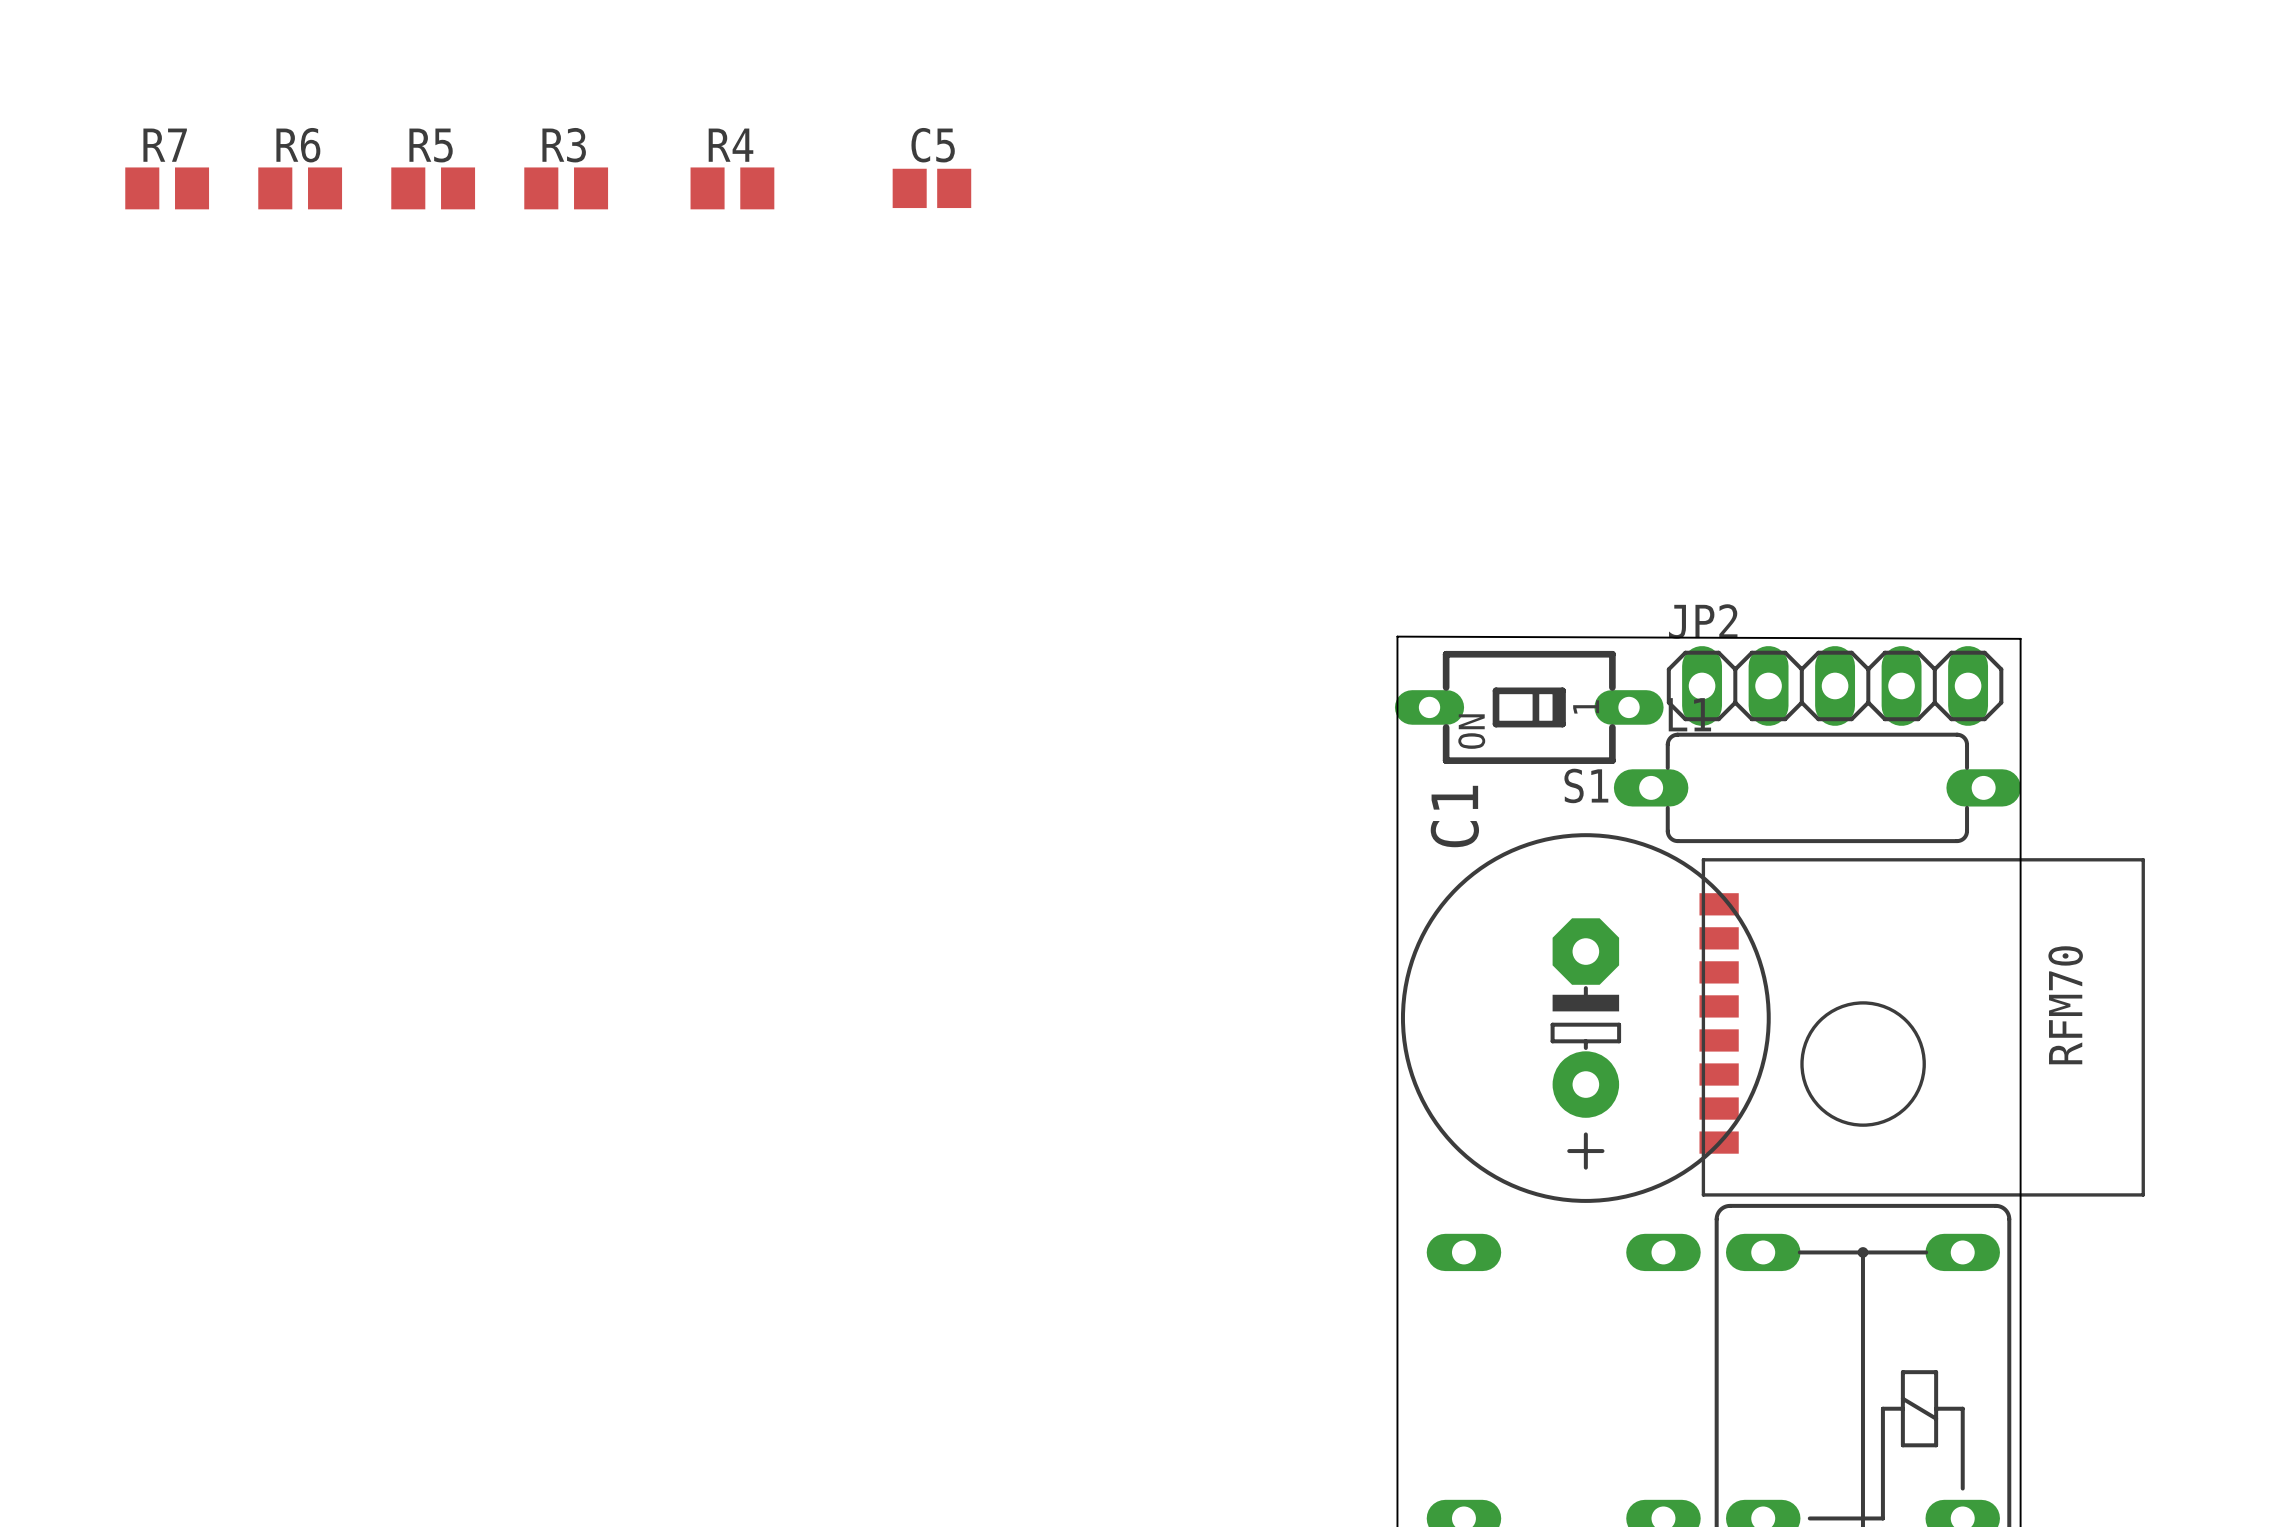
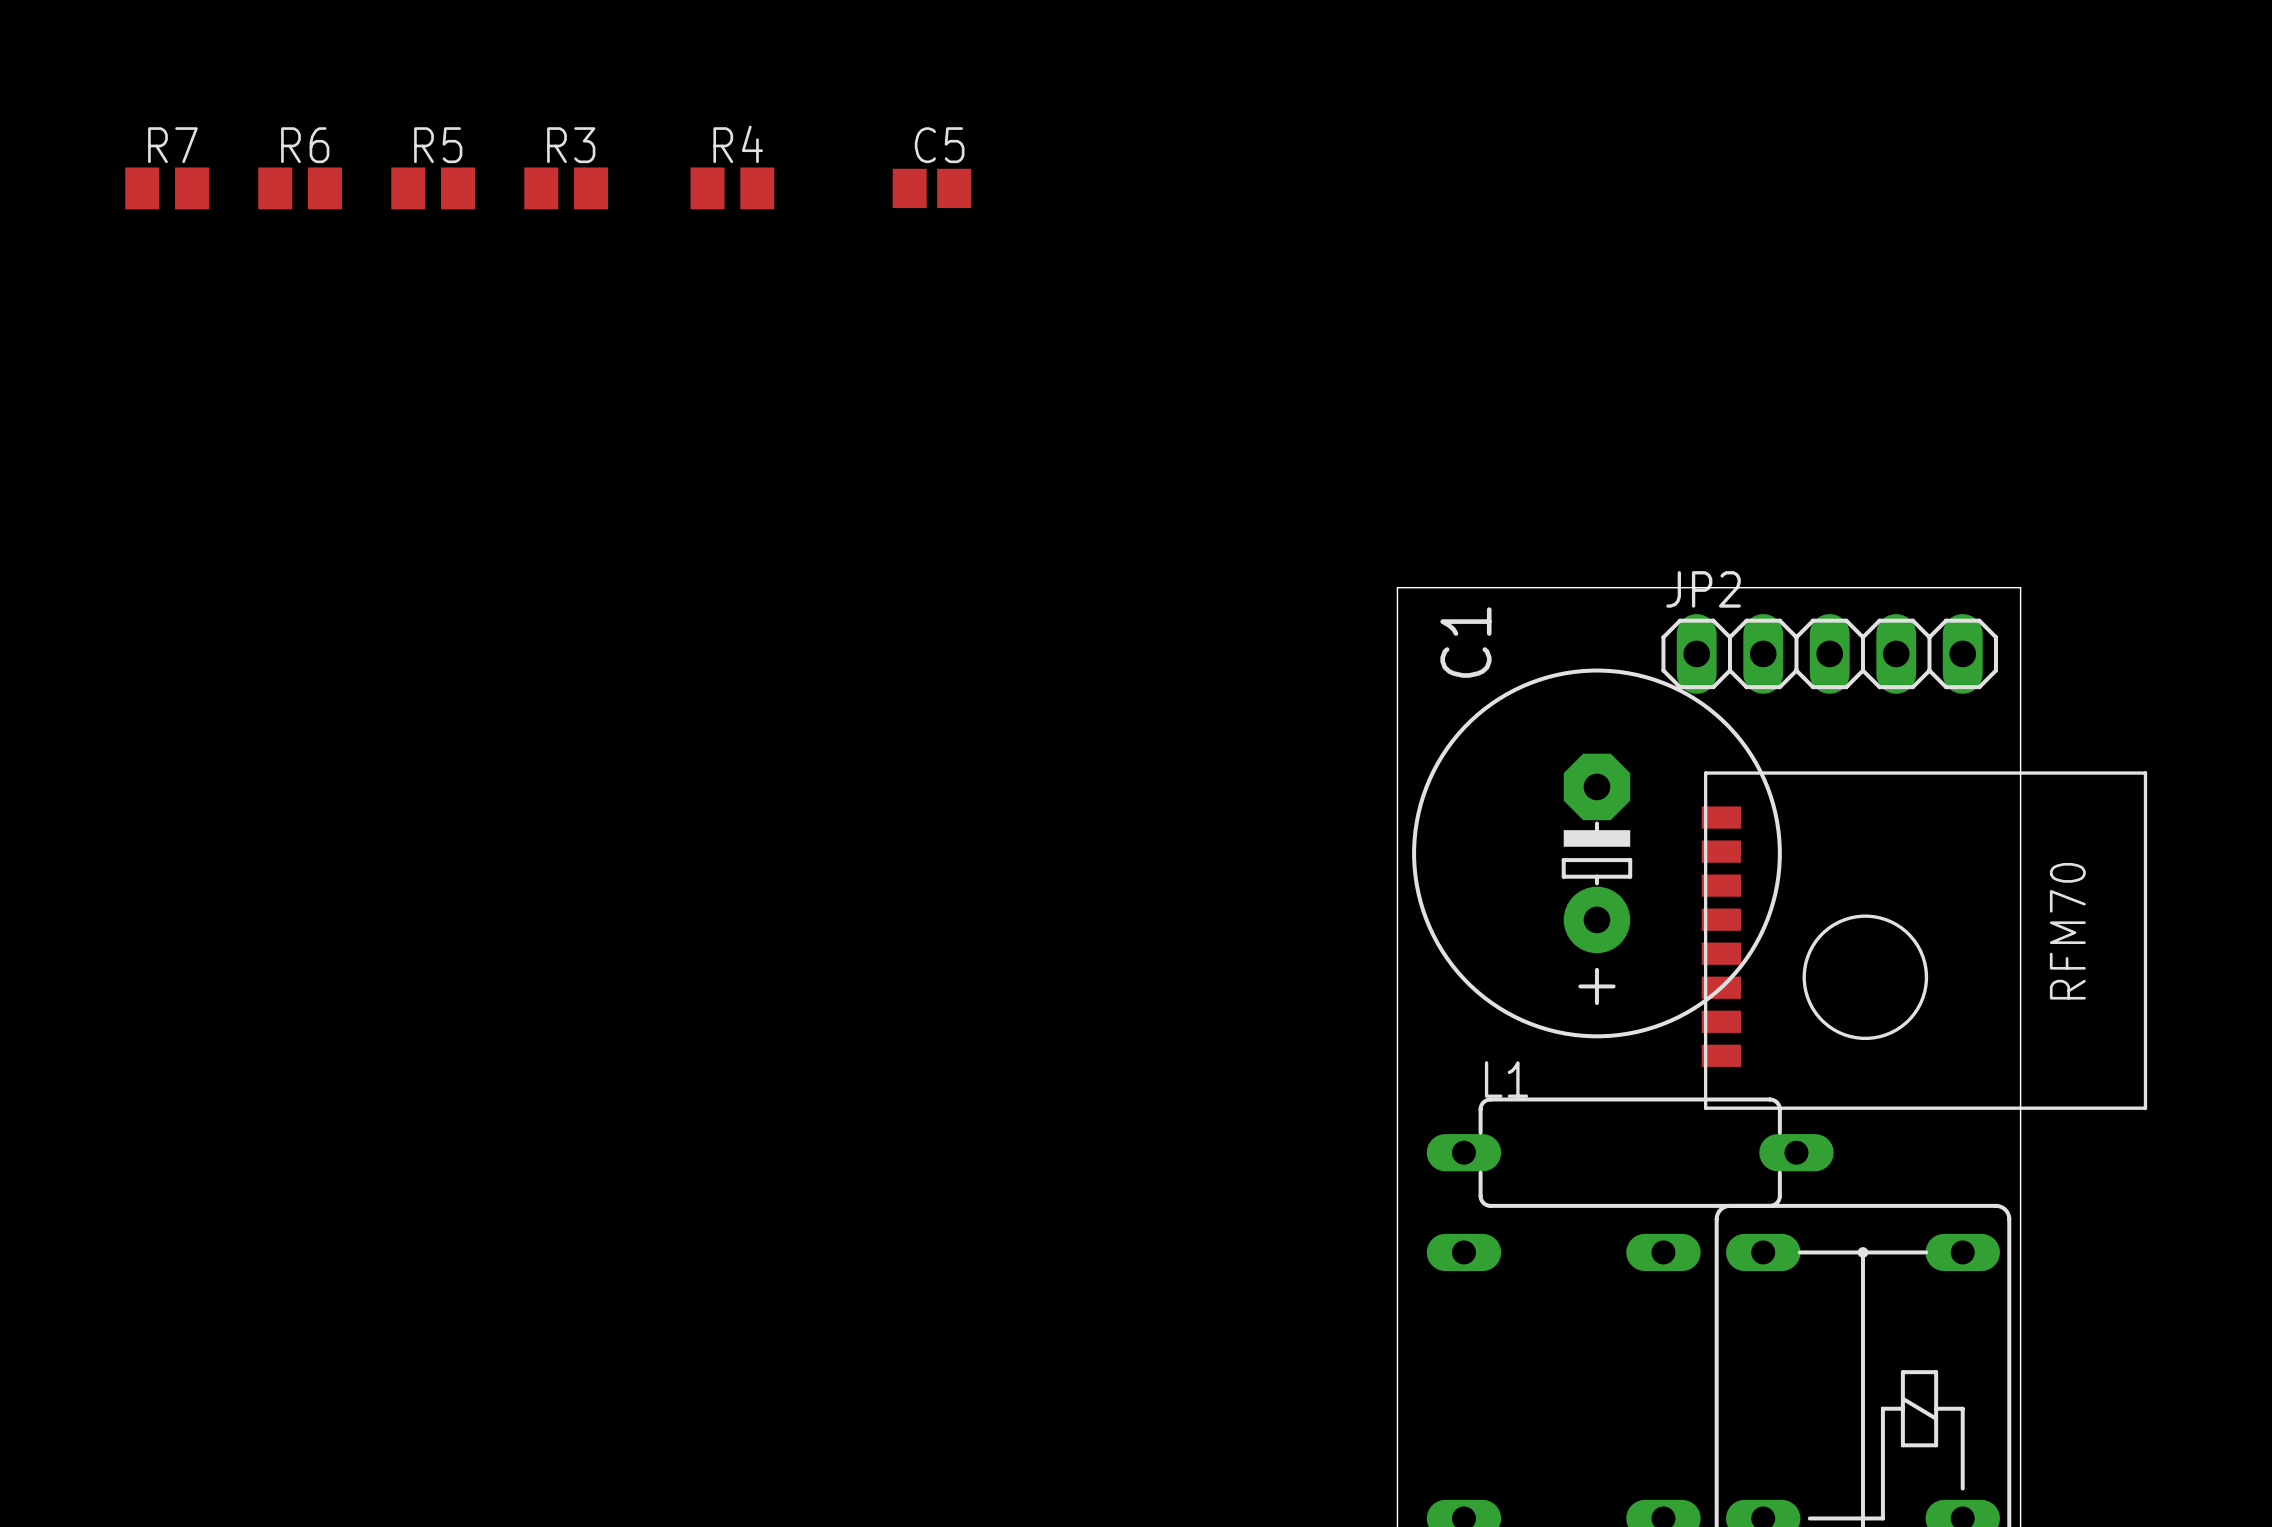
board edge: (1397, 636) (2020, 638) -> (1397, 636) (1397, 587) (2020, 587) (2020, 638)
JP2 position: (1835, 685) -> (1829, 653)
S1: (1529, 707) -> none
L1 position: (1817, 787) -> (1630, 1152)
C1 position: (1585, 1018) -> (1596, 853)
part position: (1922, 1027) -> (1924, 940)

